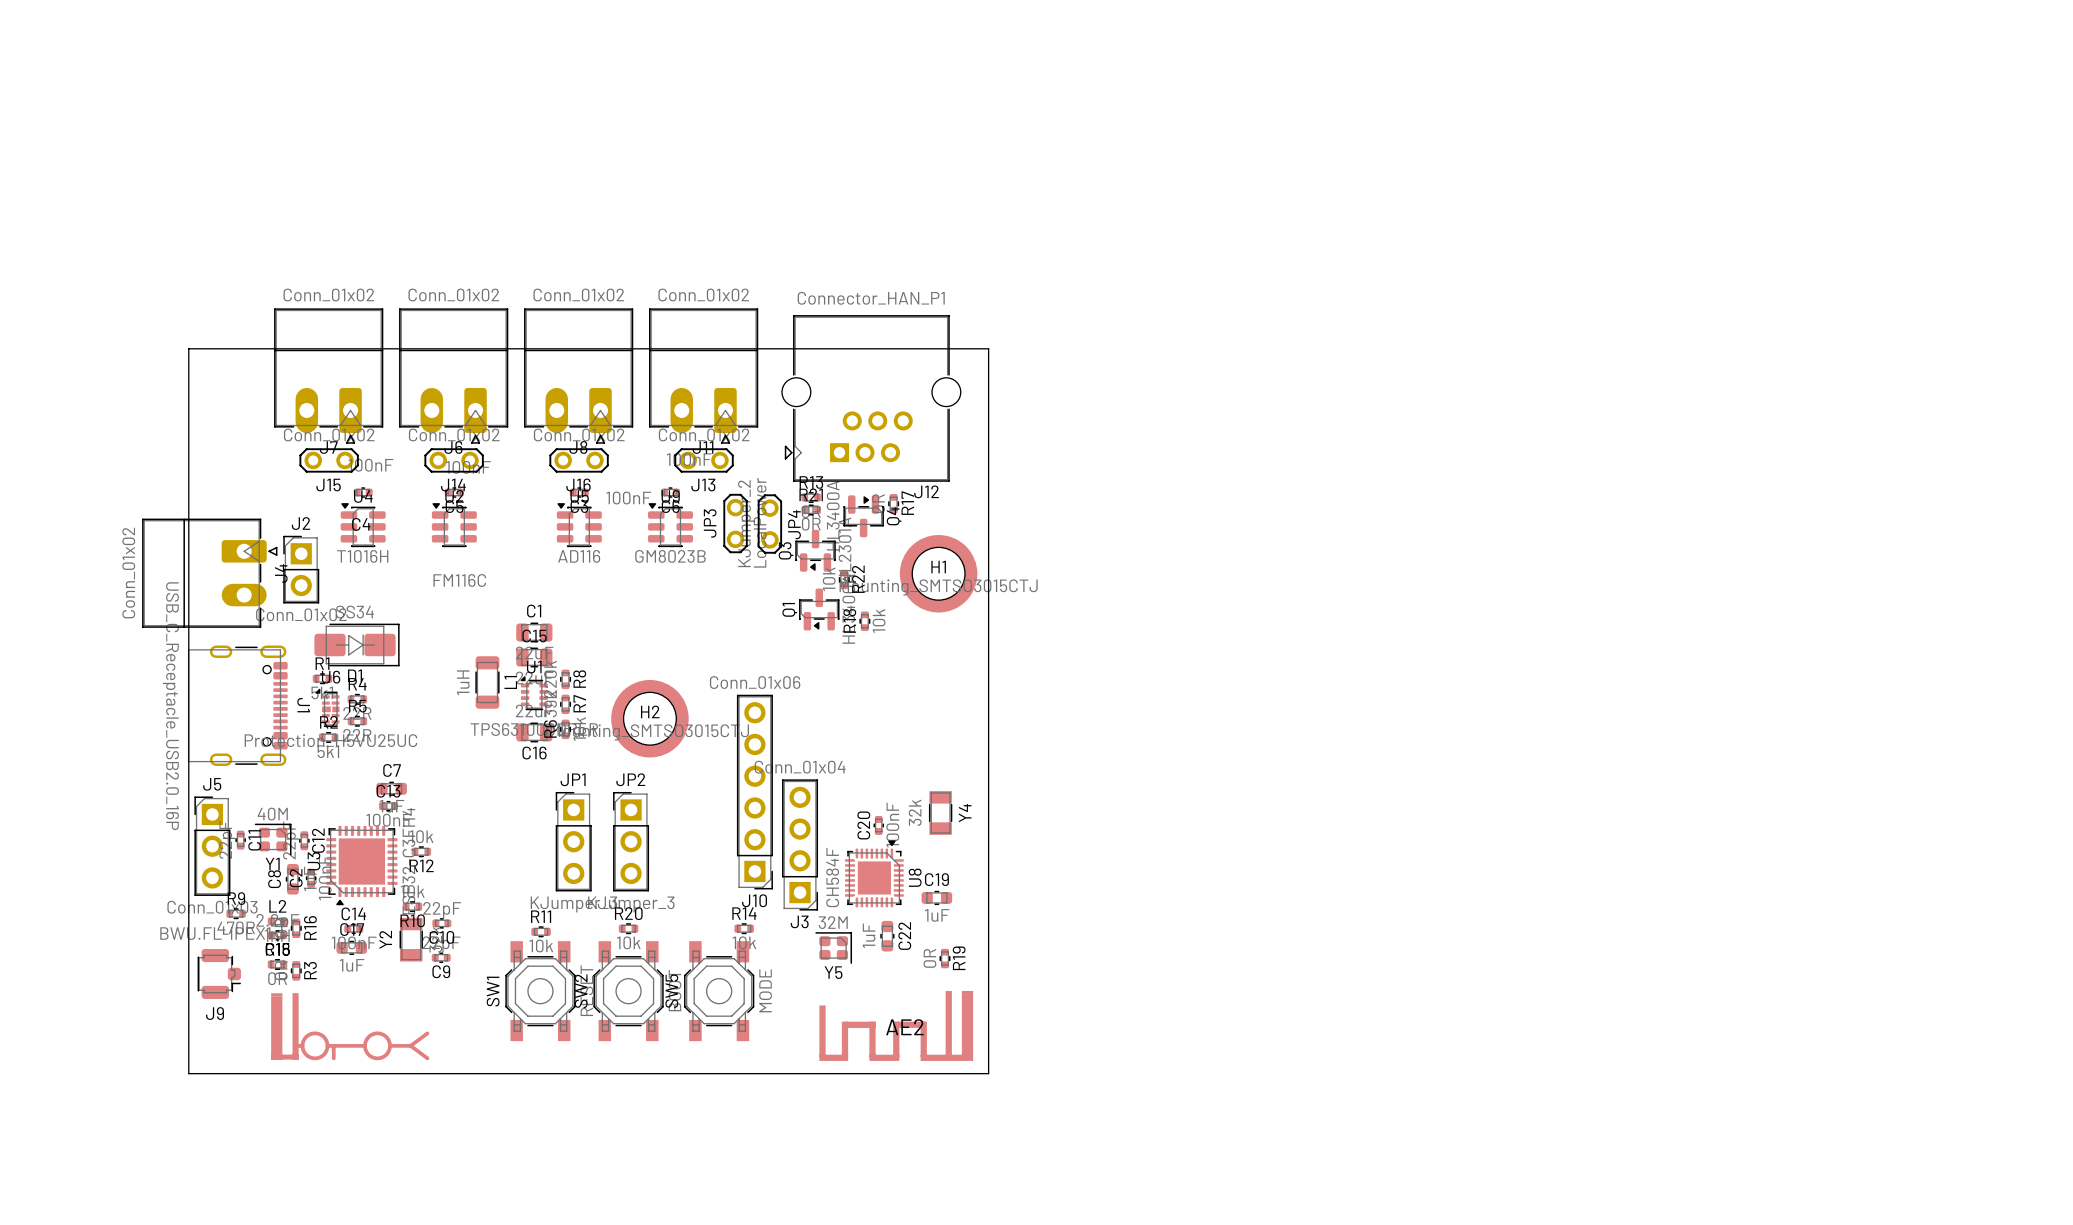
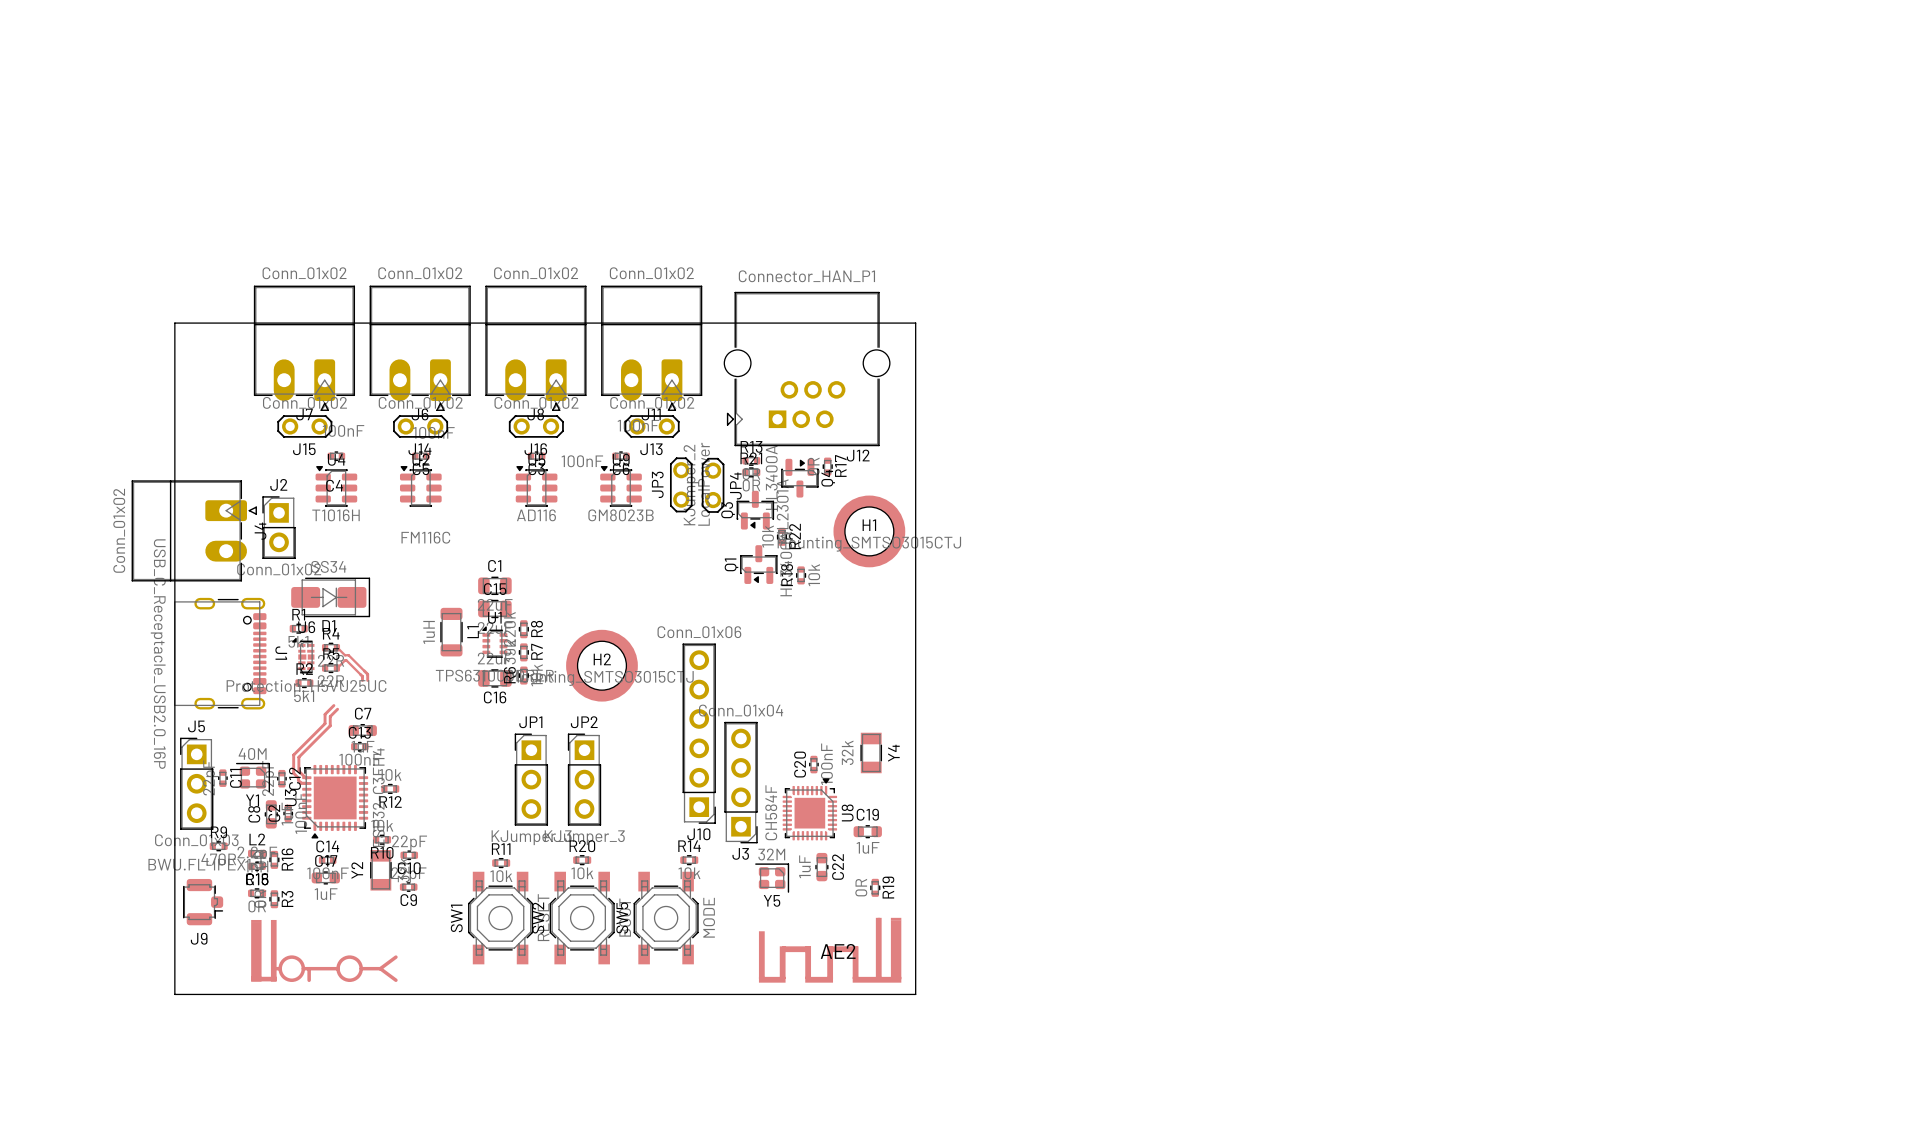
track: none -> (336, 647) (345, 655) (348, 655) (367, 674) (367, 680)
track: none -> (336, 668) (346, 660) (362, 676) (362, 680)
track: none -> (333, 705) (325, 714) (325, 723) (293, 755) (293, 773) (301, 783) (306, 783)
track: none -> (337, 709) (330, 716) (330, 725) (298, 757) (298, 771) (306, 777)

